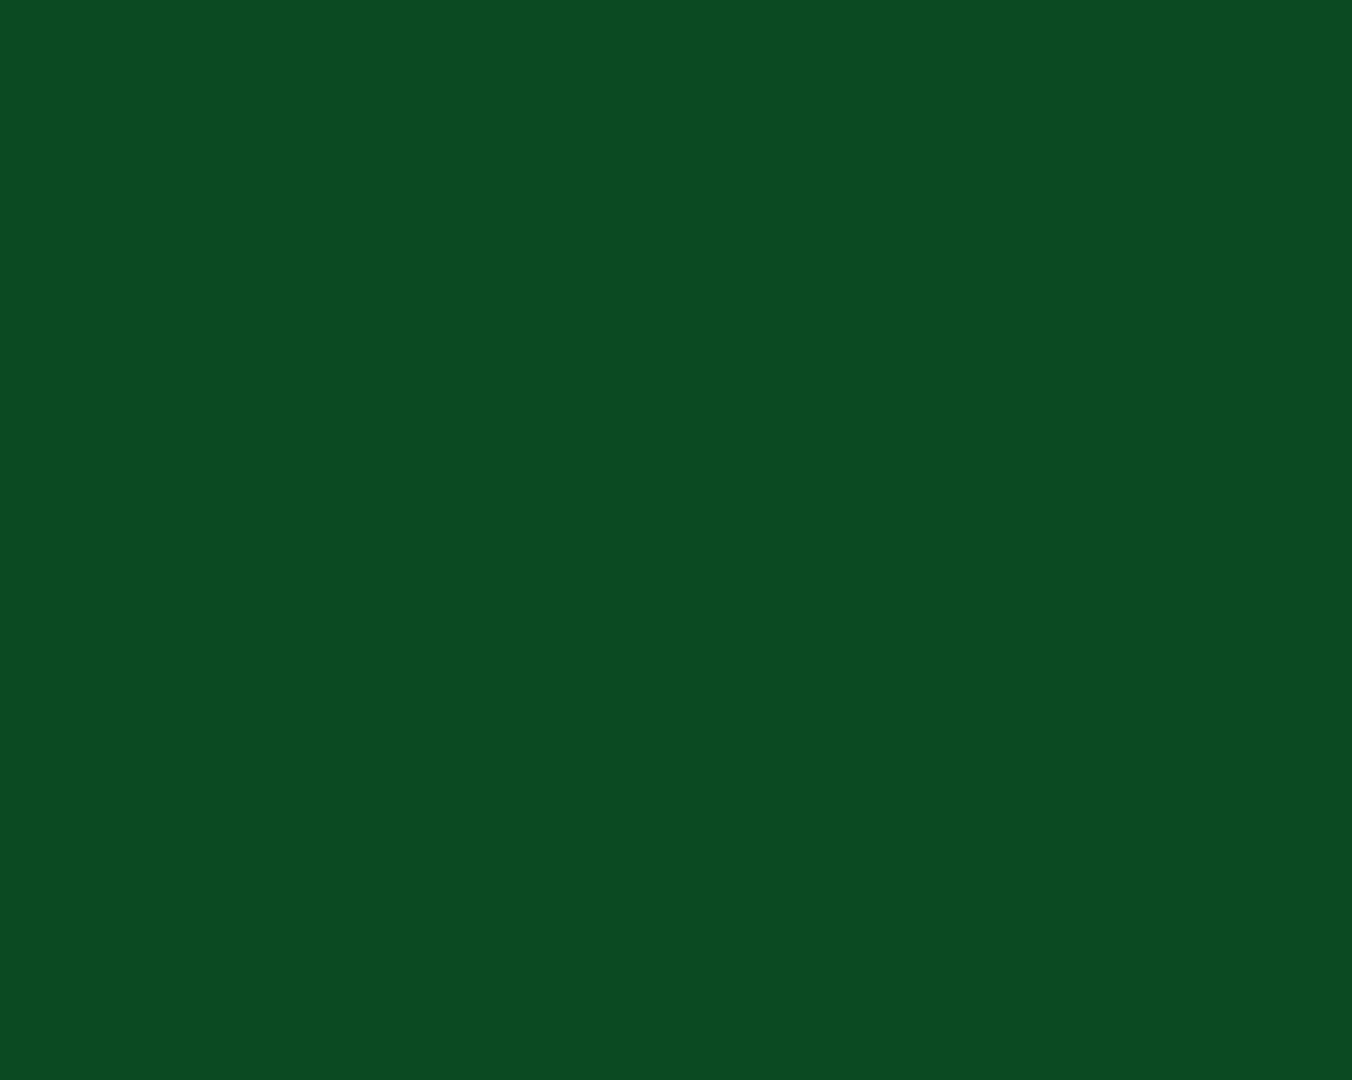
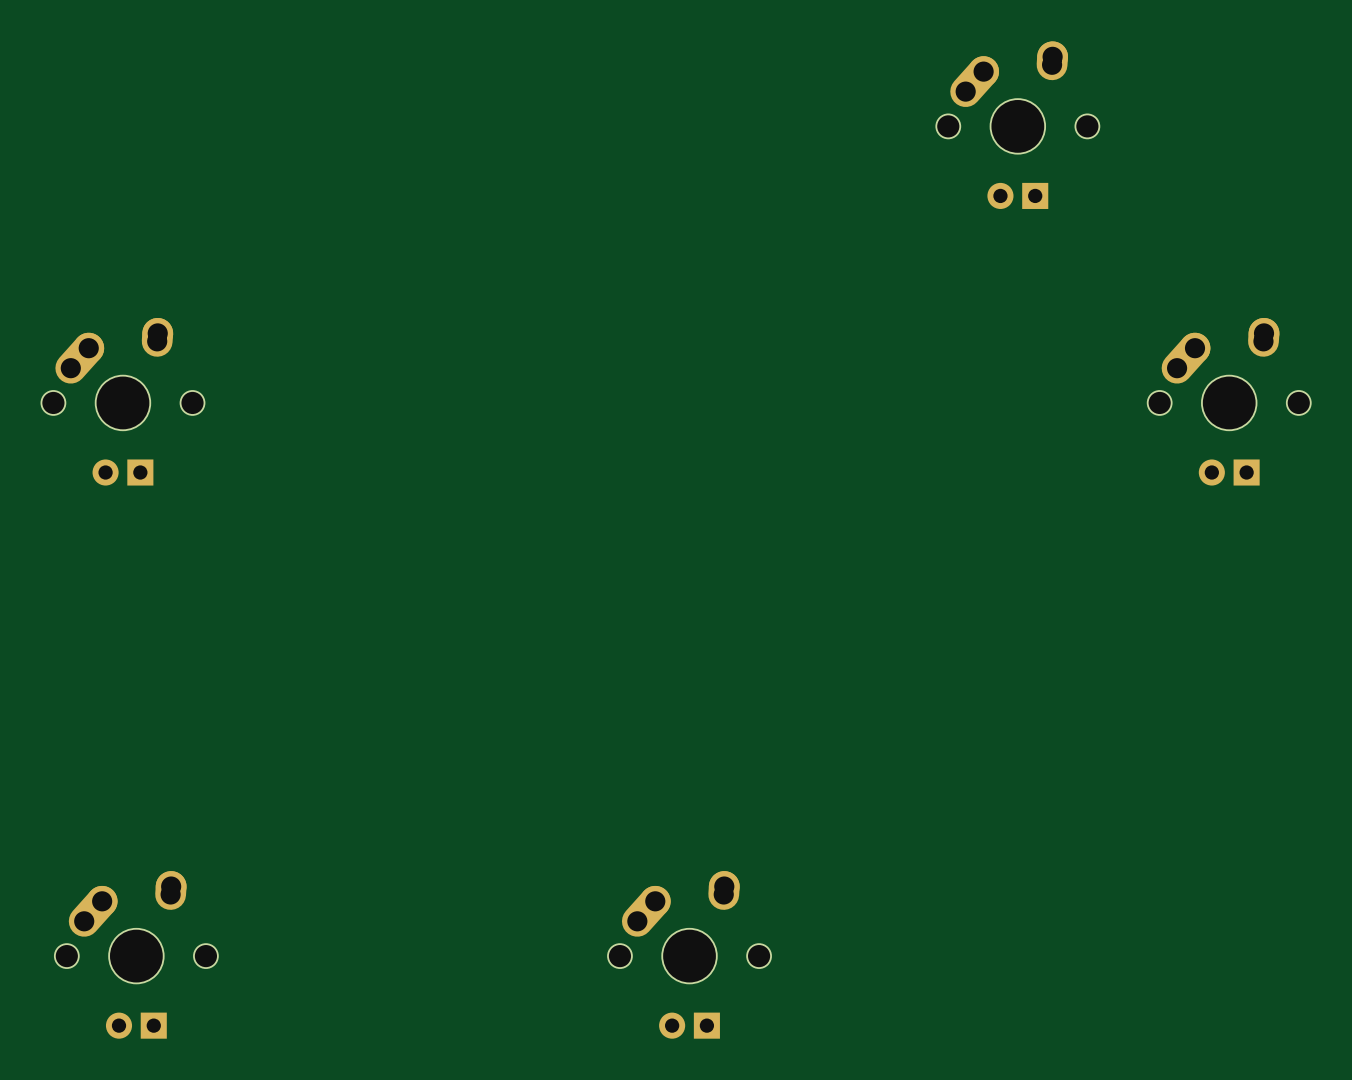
part: none -> (1017, 125)
part: none -> (122, 401)
part: none -> (1229, 401)
part: none -> (136, 954)
part: none -> (689, 954)

